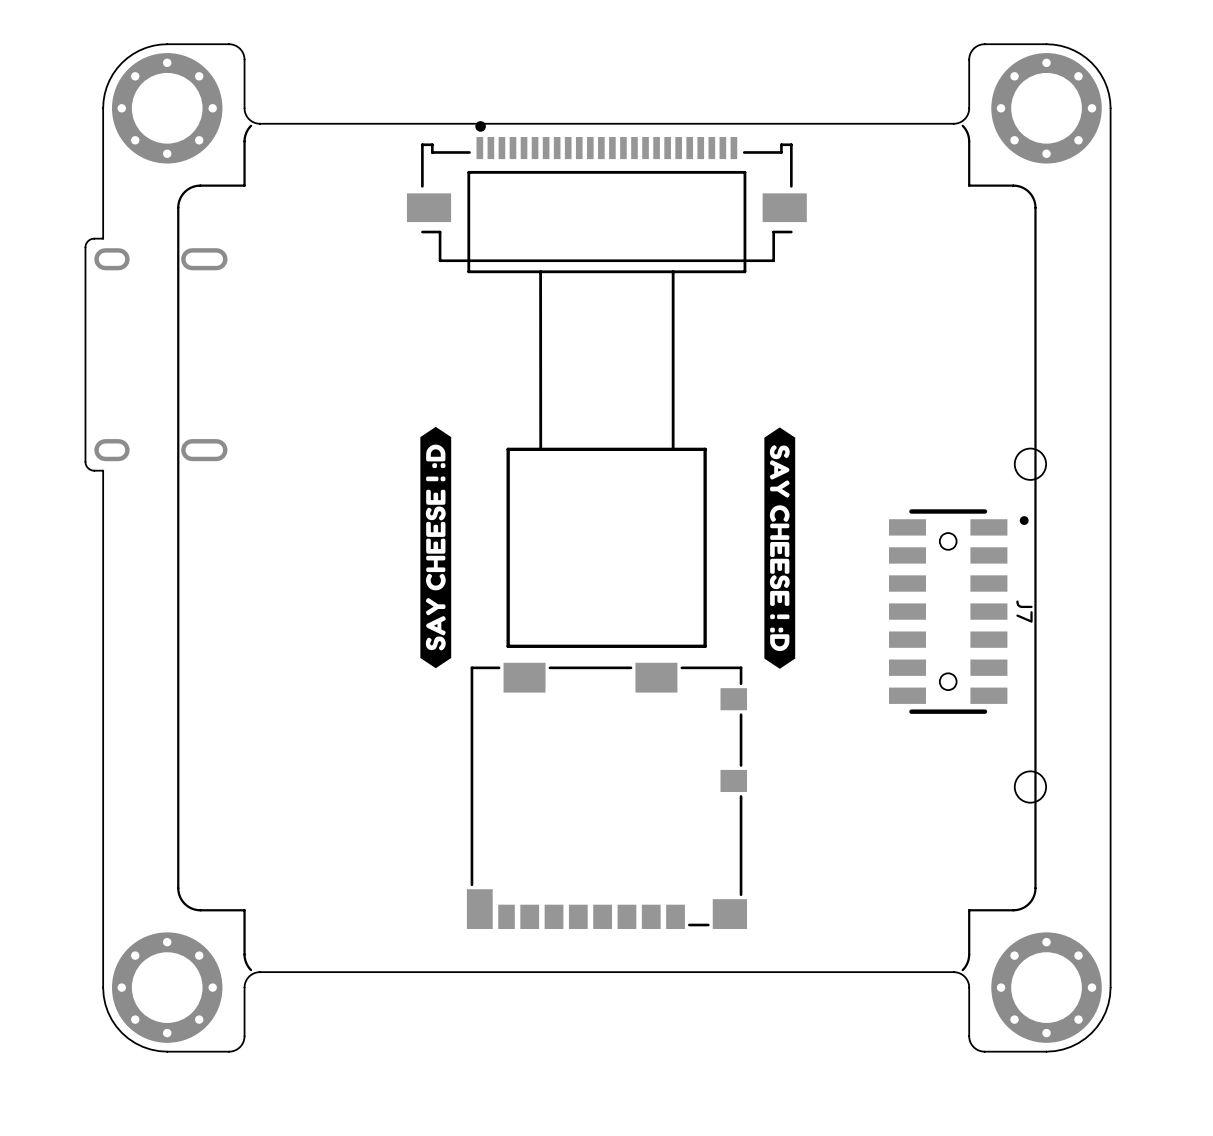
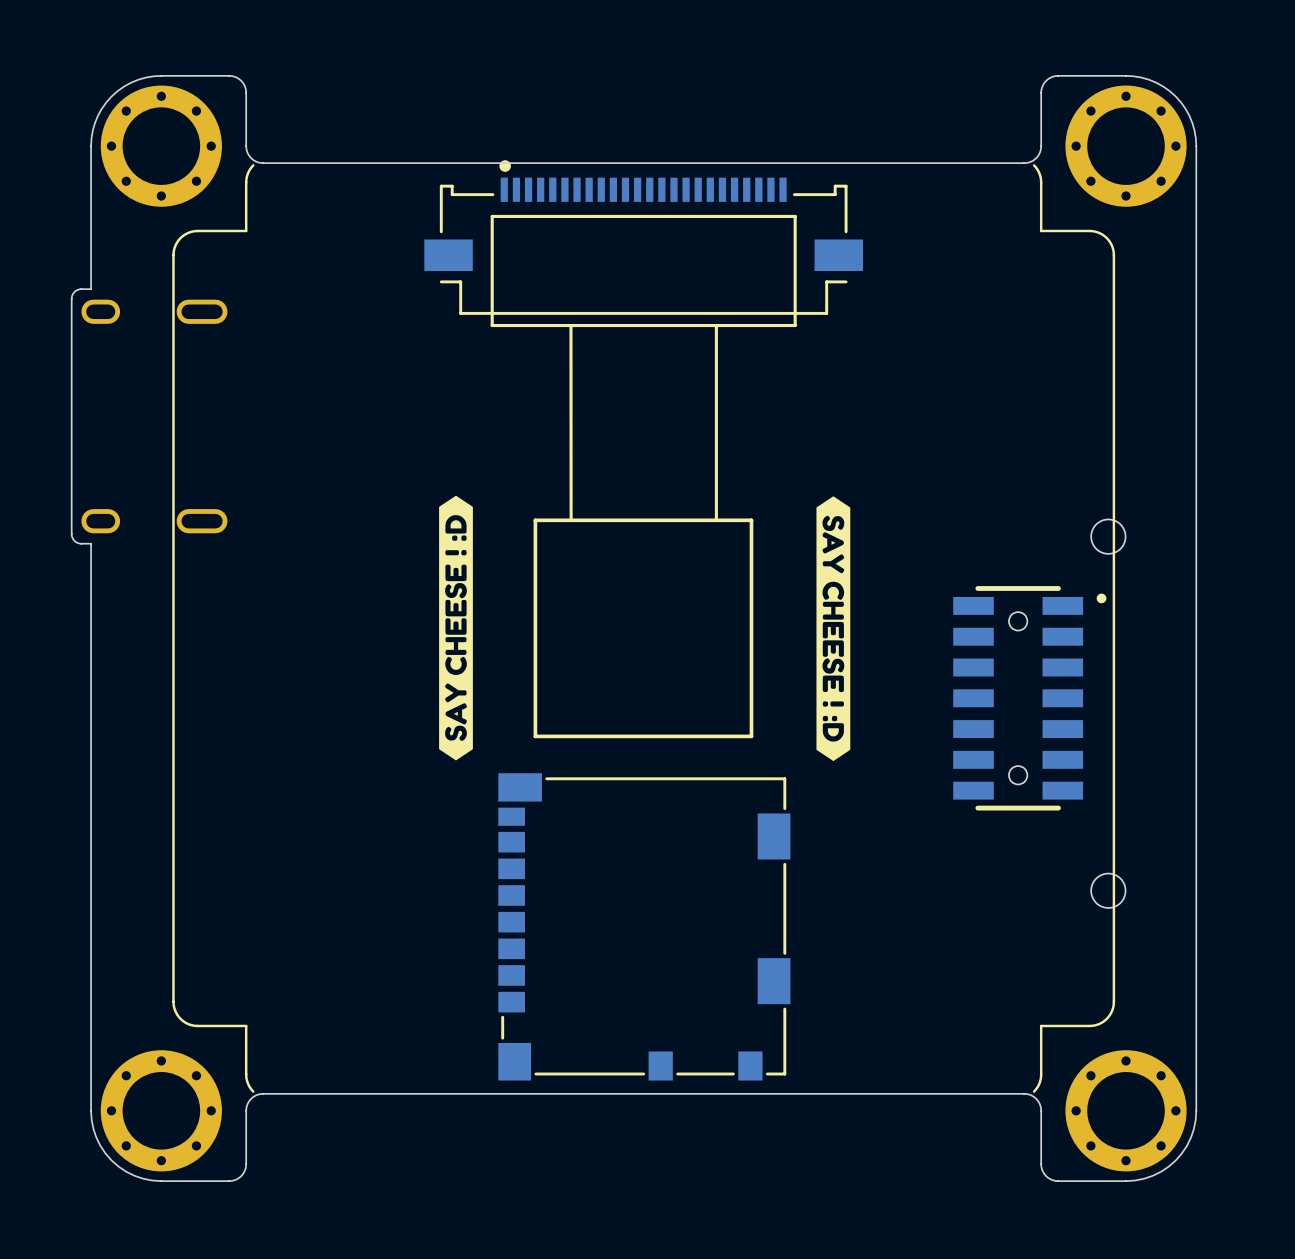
J7 name: J7 (1024, 611) -> none
part rotation: 0° (606, 795) -> 90° clockwise (644, 926)

